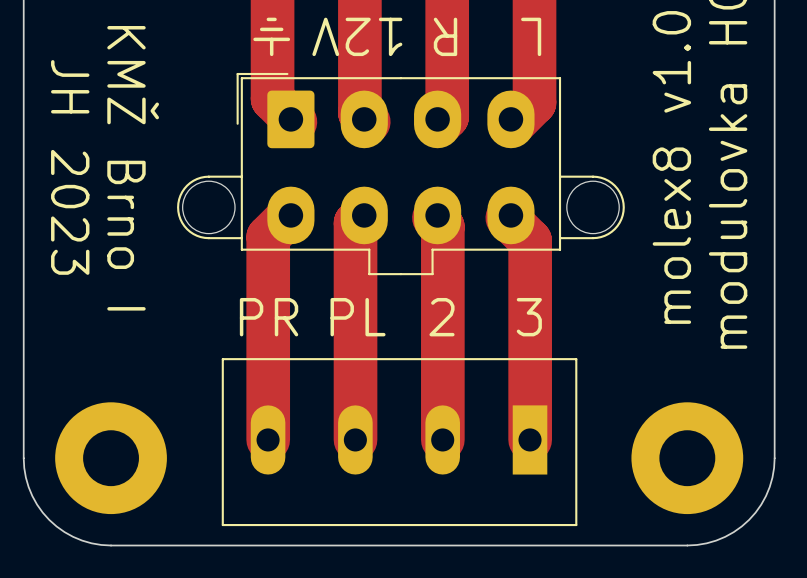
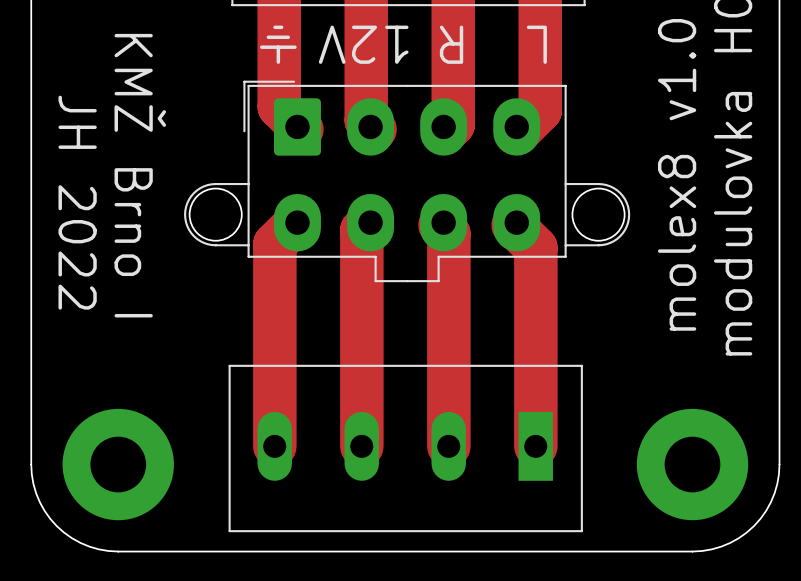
text: JH 2023 (70, 167) -> JH 2022 (77, 202)
text: PR (269, 317) -> none
text: PL (358, 317) -> none
text: 2 (442, 317) -> none
text: 3 (529, 317) -> none

